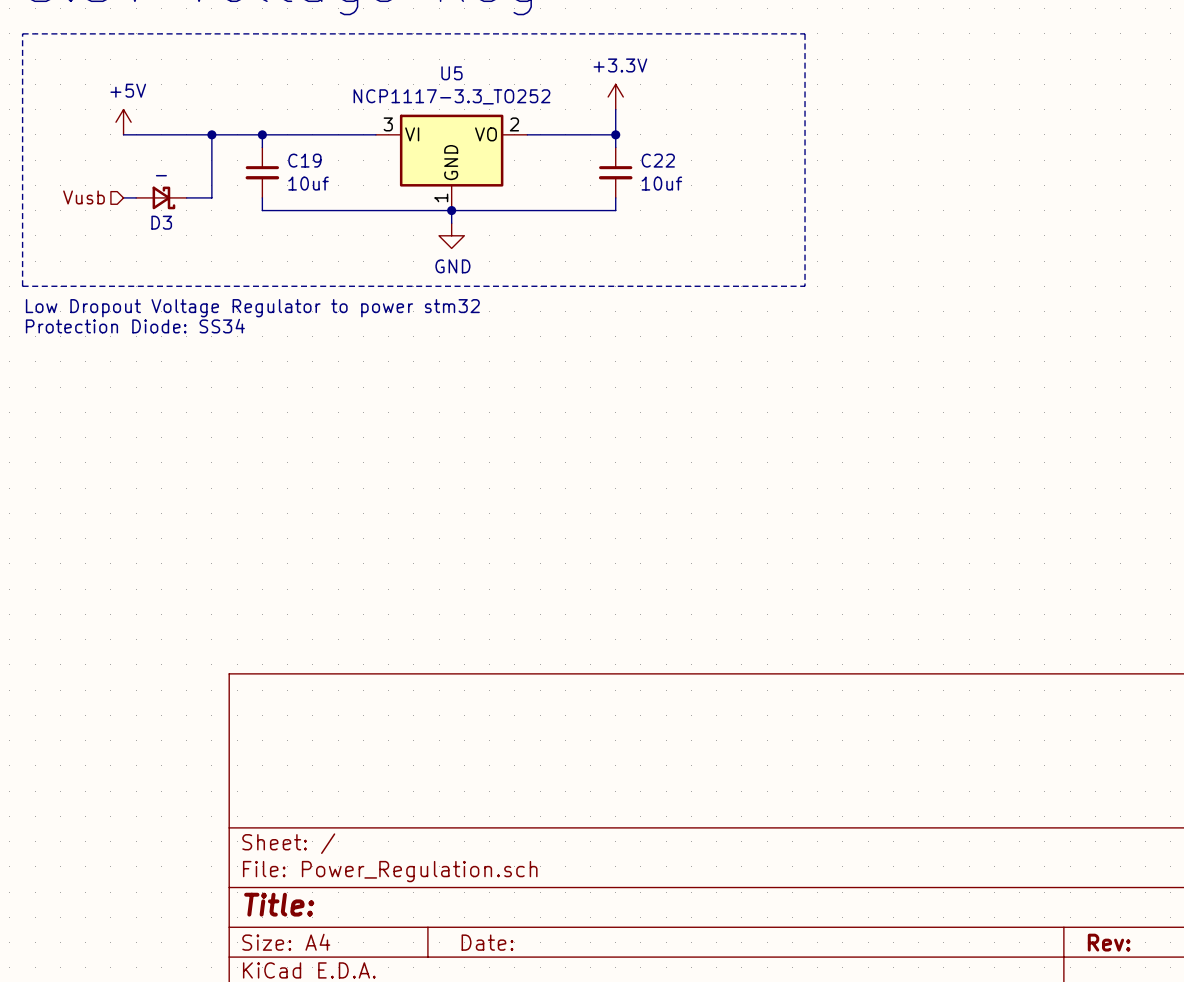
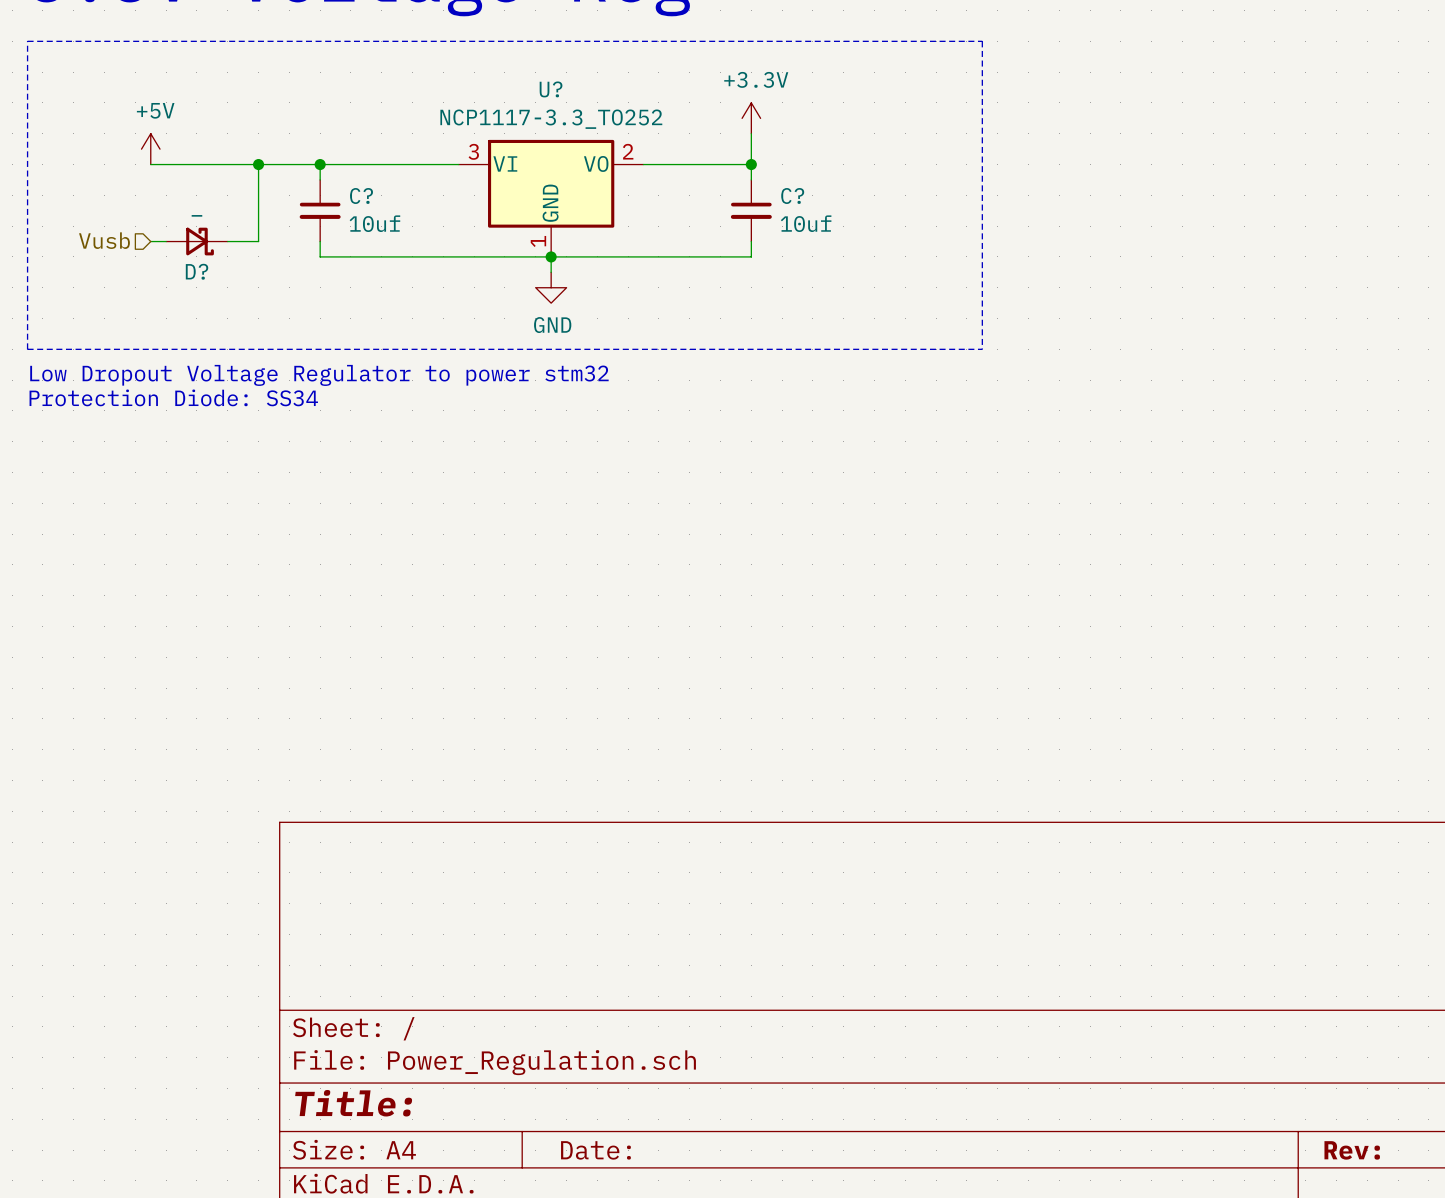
U5 name: U5 (451, 73) -> U? (551, 89)
C19 name: C19 (304, 160) -> C? (361, 196)
C22 name: C22 (658, 160) -> C? (792, 196)
D3 name: D3 (161, 222) -> D? (197, 271)

